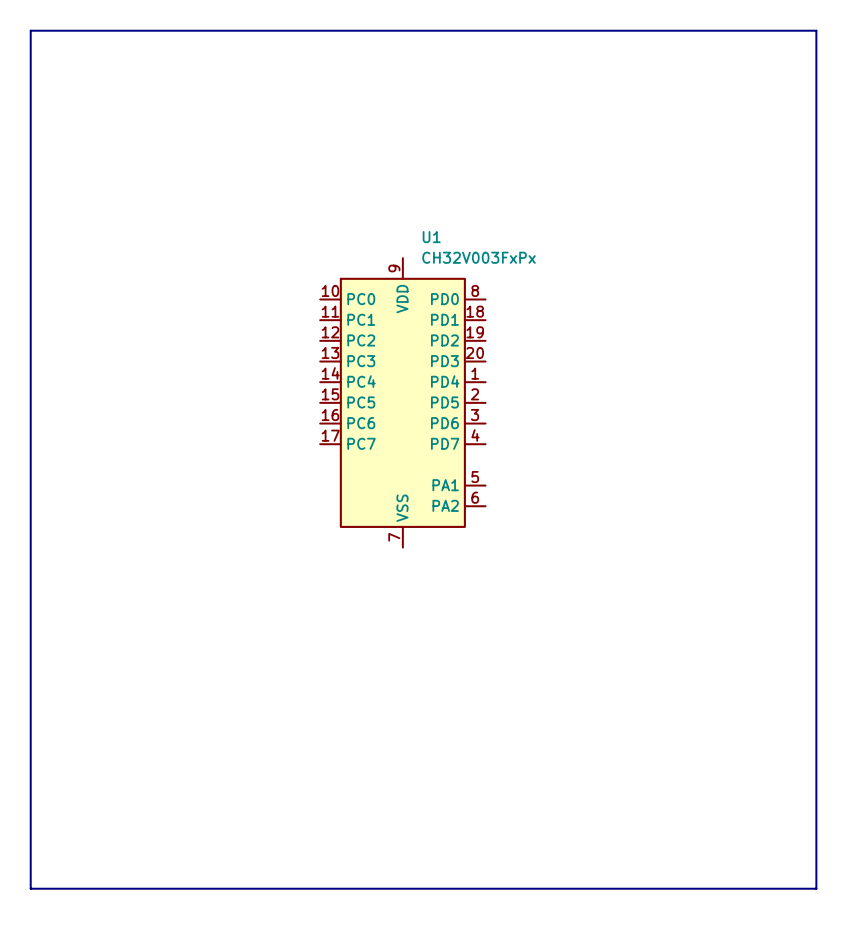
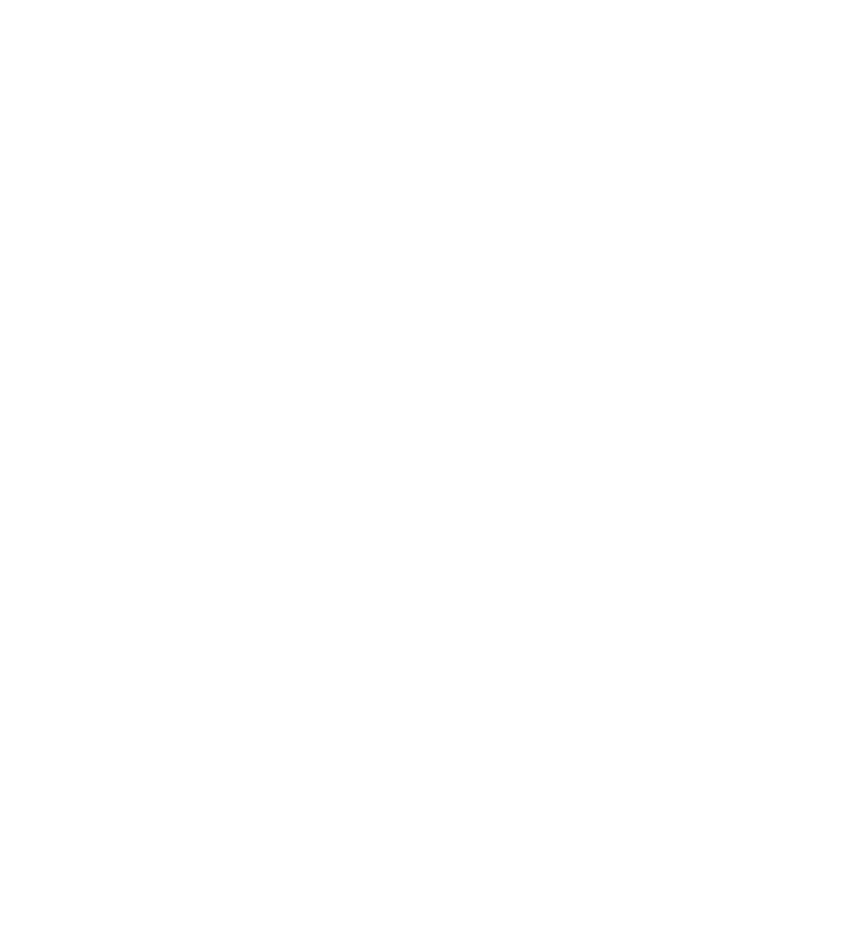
line: (30, 30) (816, 30) (816, 888) (30, 888) (30, 30) -> none
U1: CH32V003FxPx (402, 402) -> none

